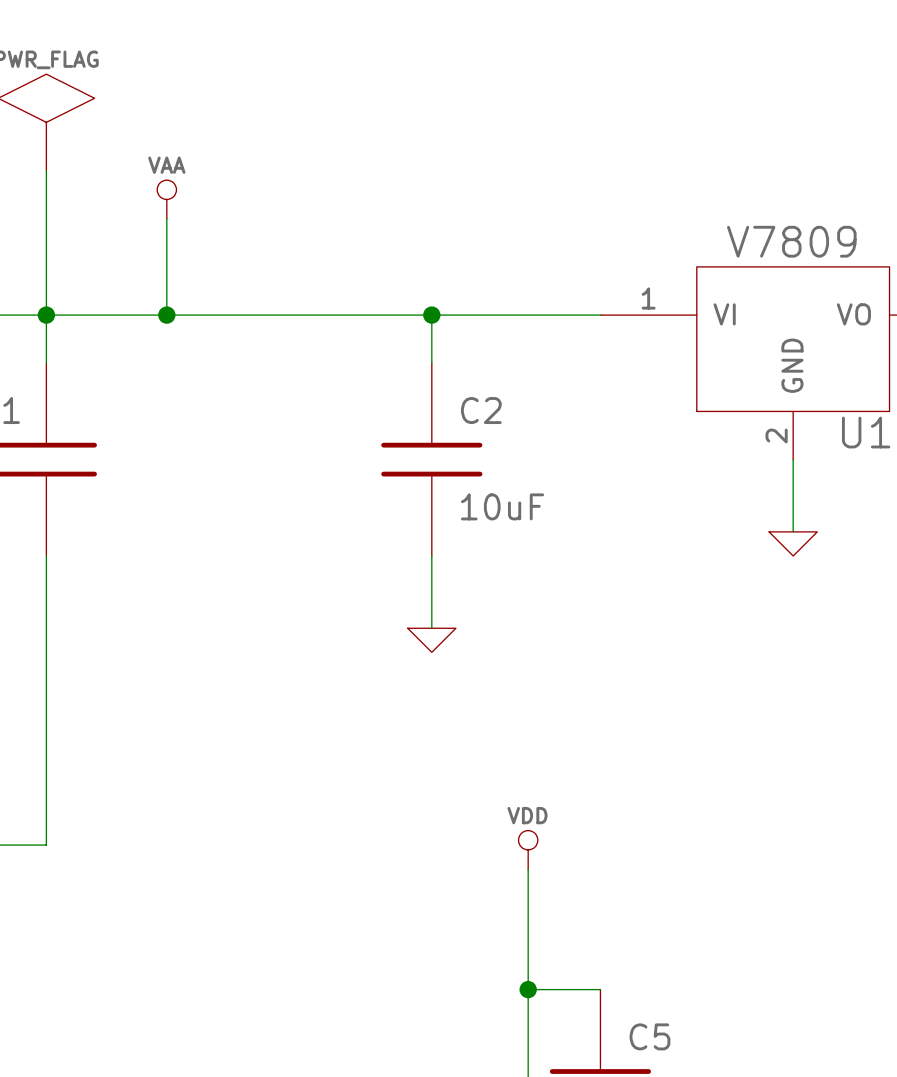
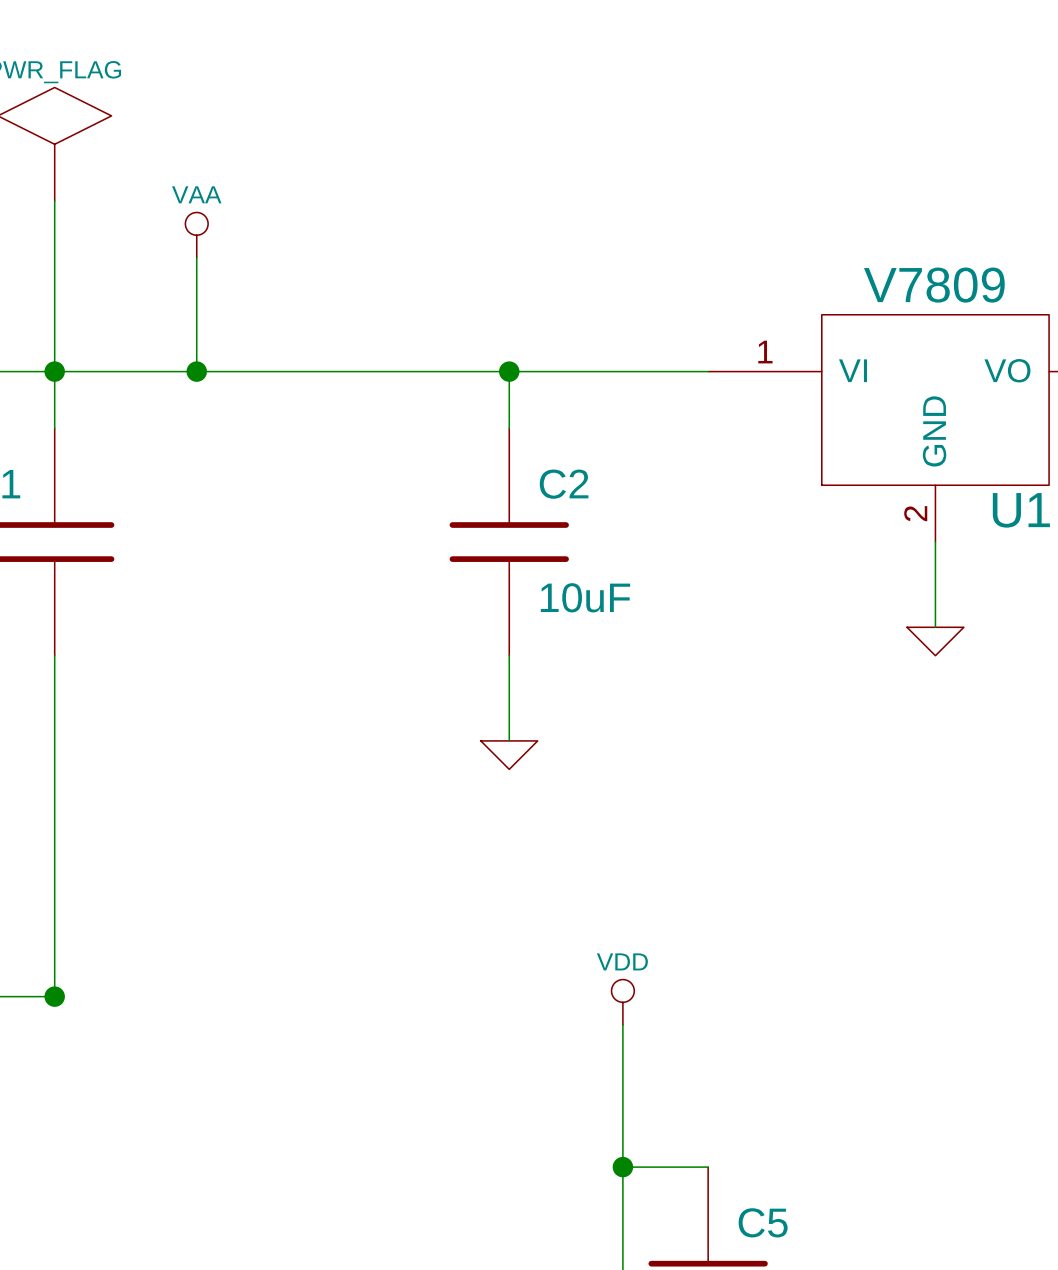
junction: none -> (54, 996)

